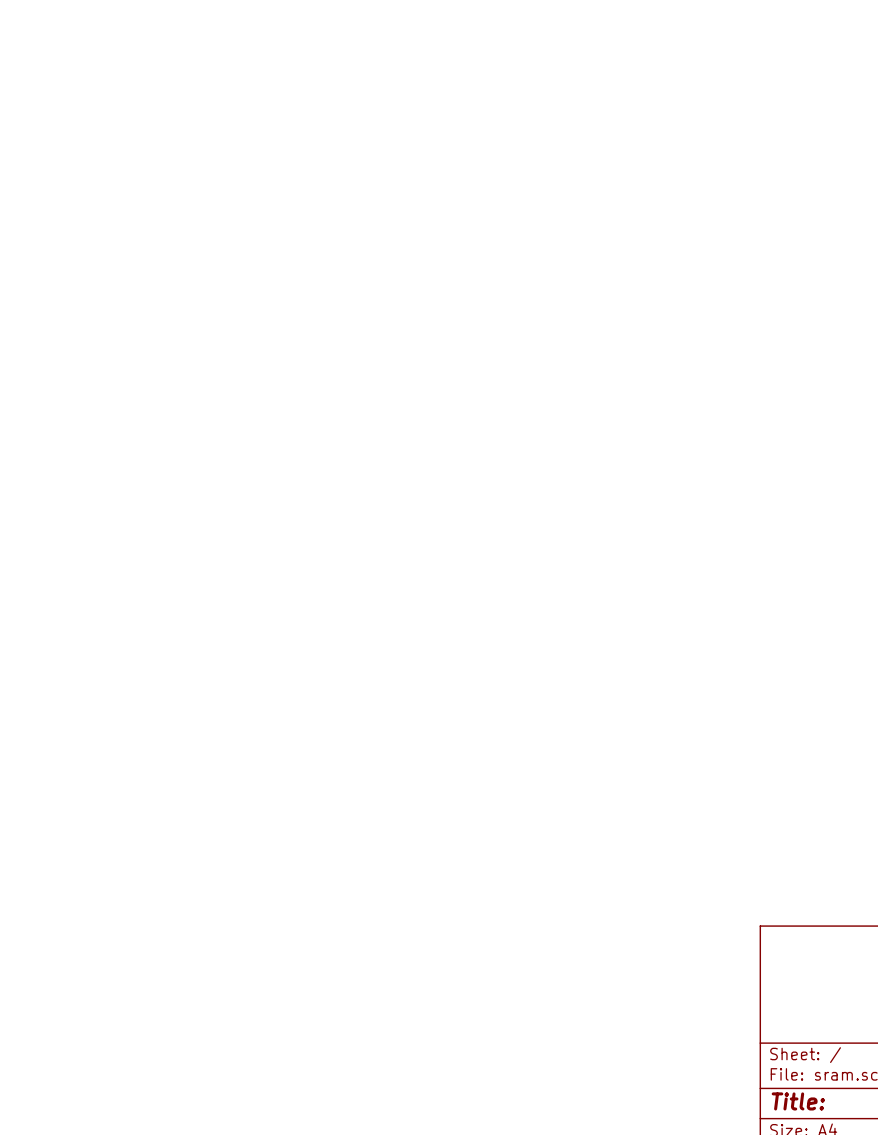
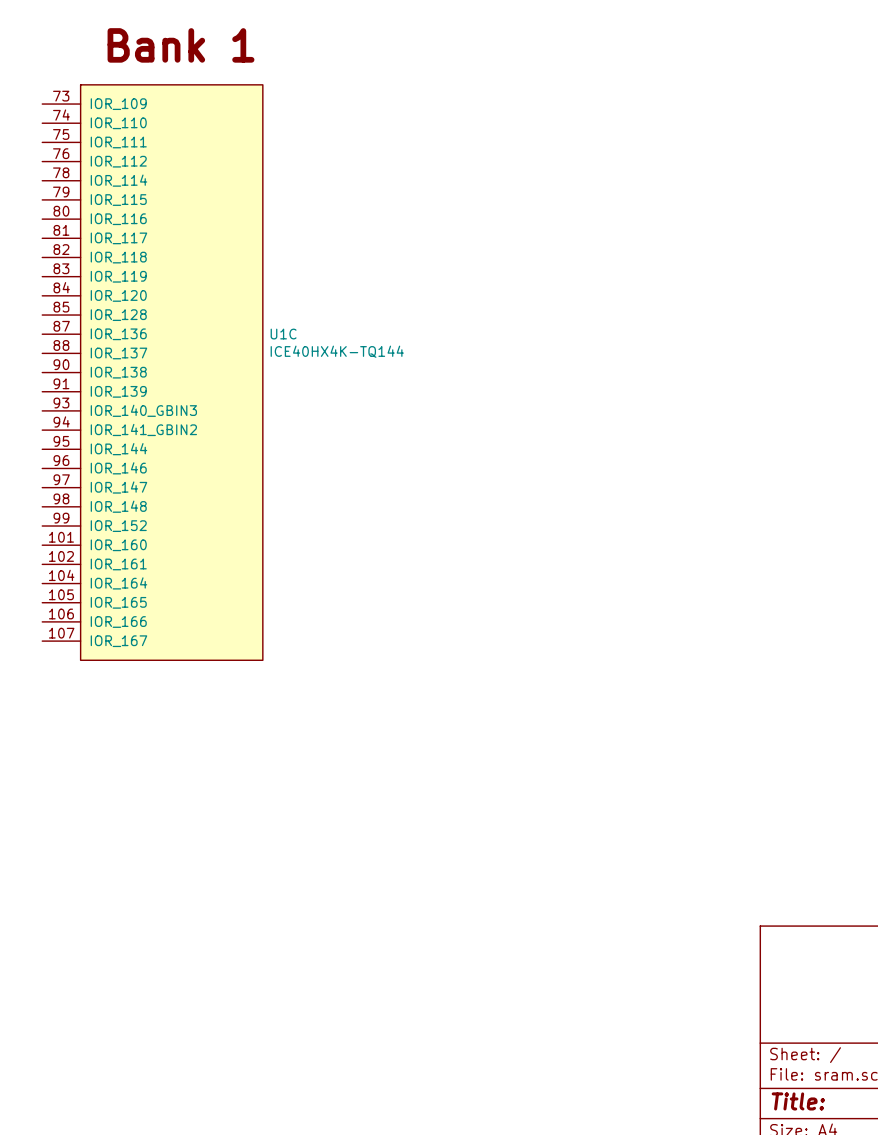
U1C: none -> ICE40HX4K-TQ144 (152, 372)

